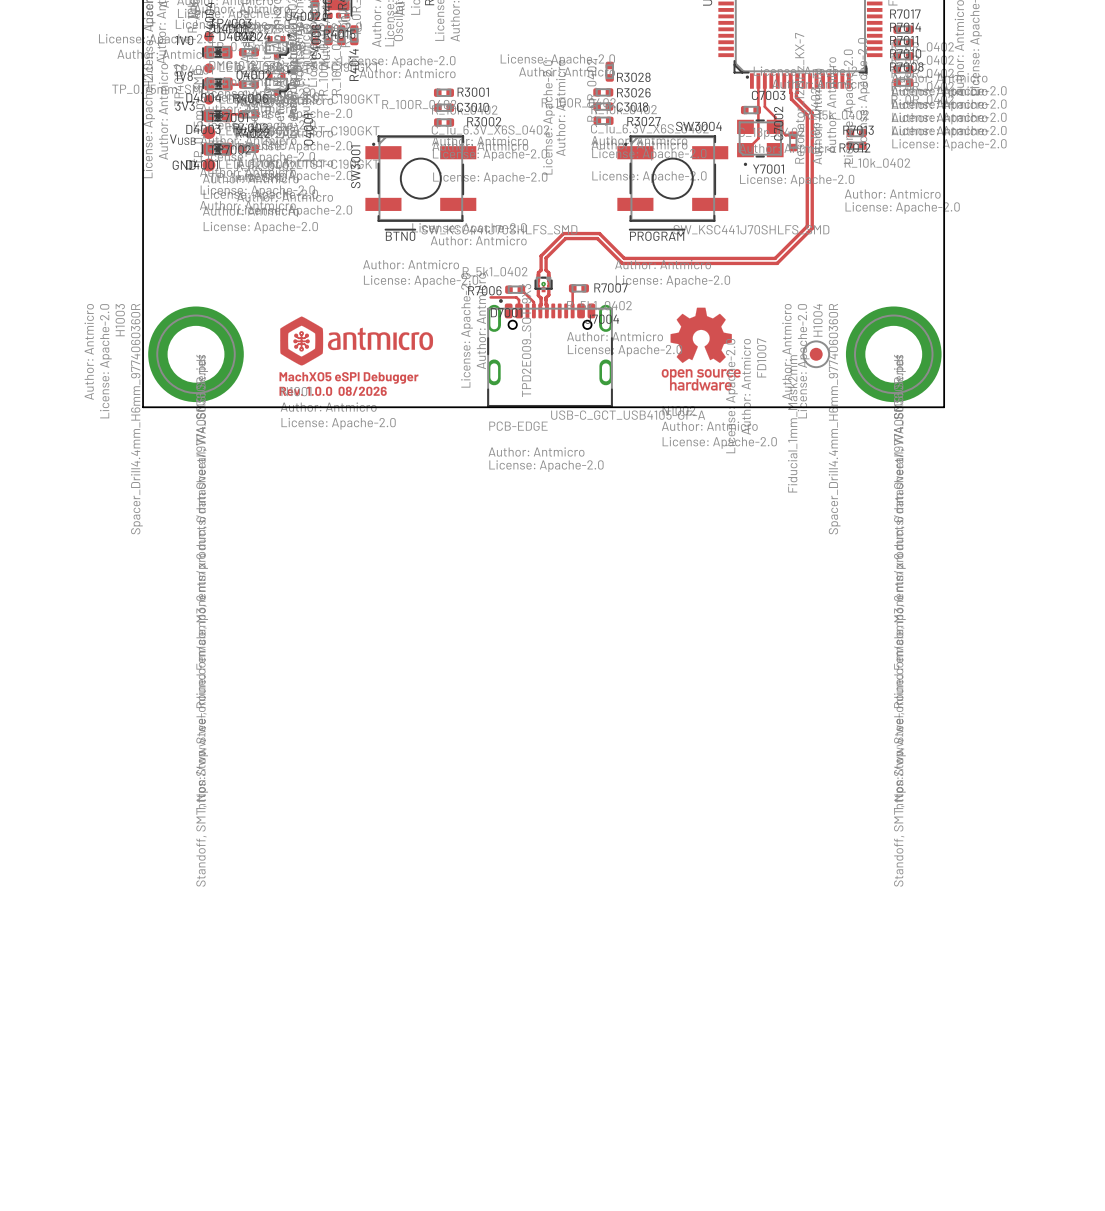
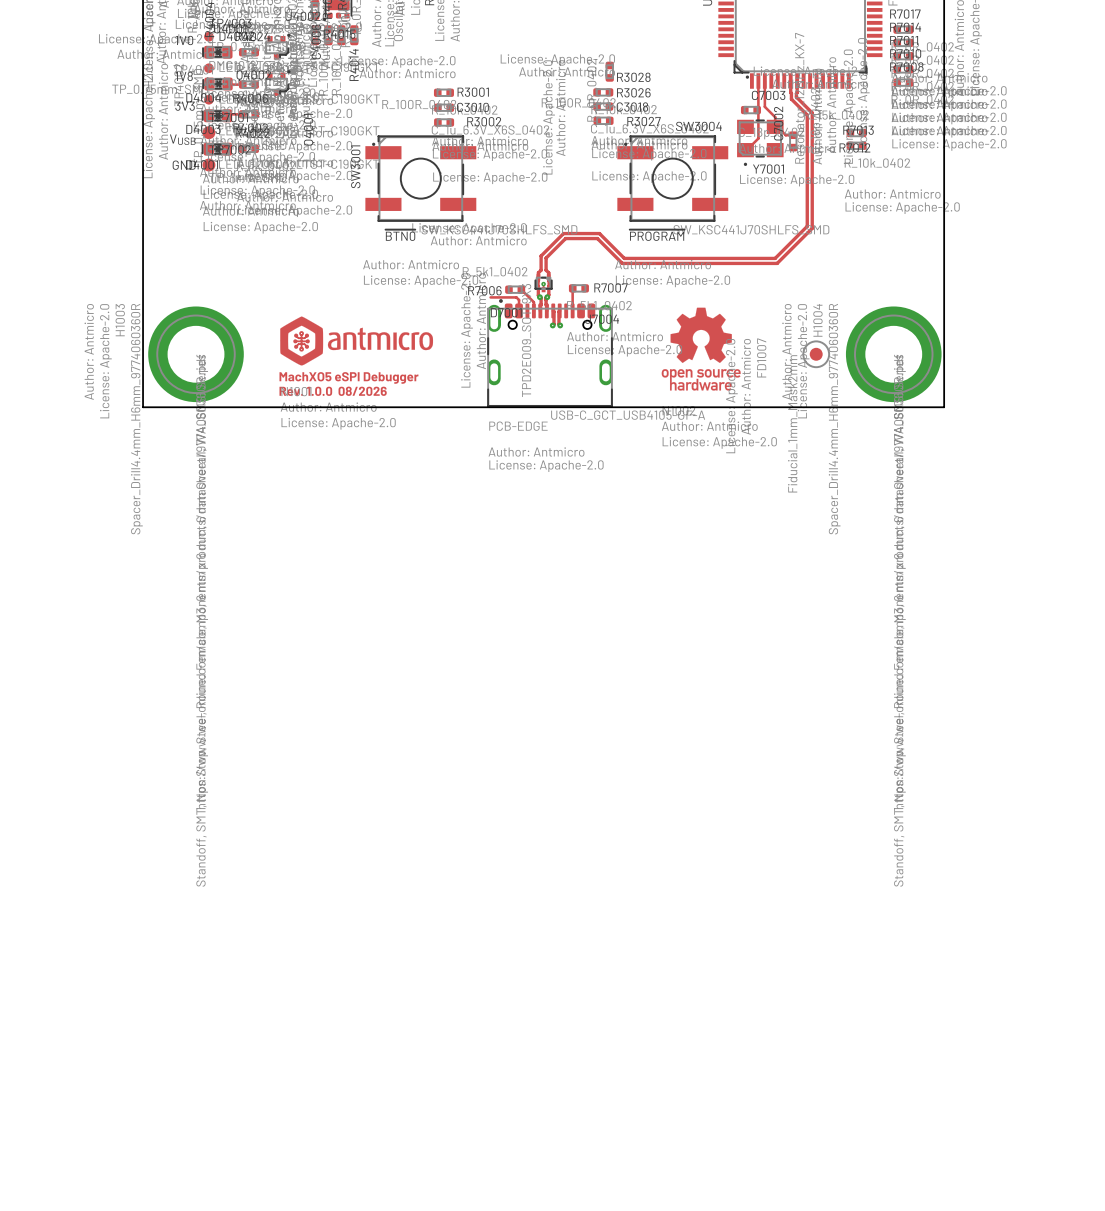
via: none -> (539, 297)
via: none -> (547, 297)
track: none -> (553, 310) (552, 325)
track: none -> (559, 310) (560, 325)
via: none -> (552, 325)
via: none -> (560, 325)

